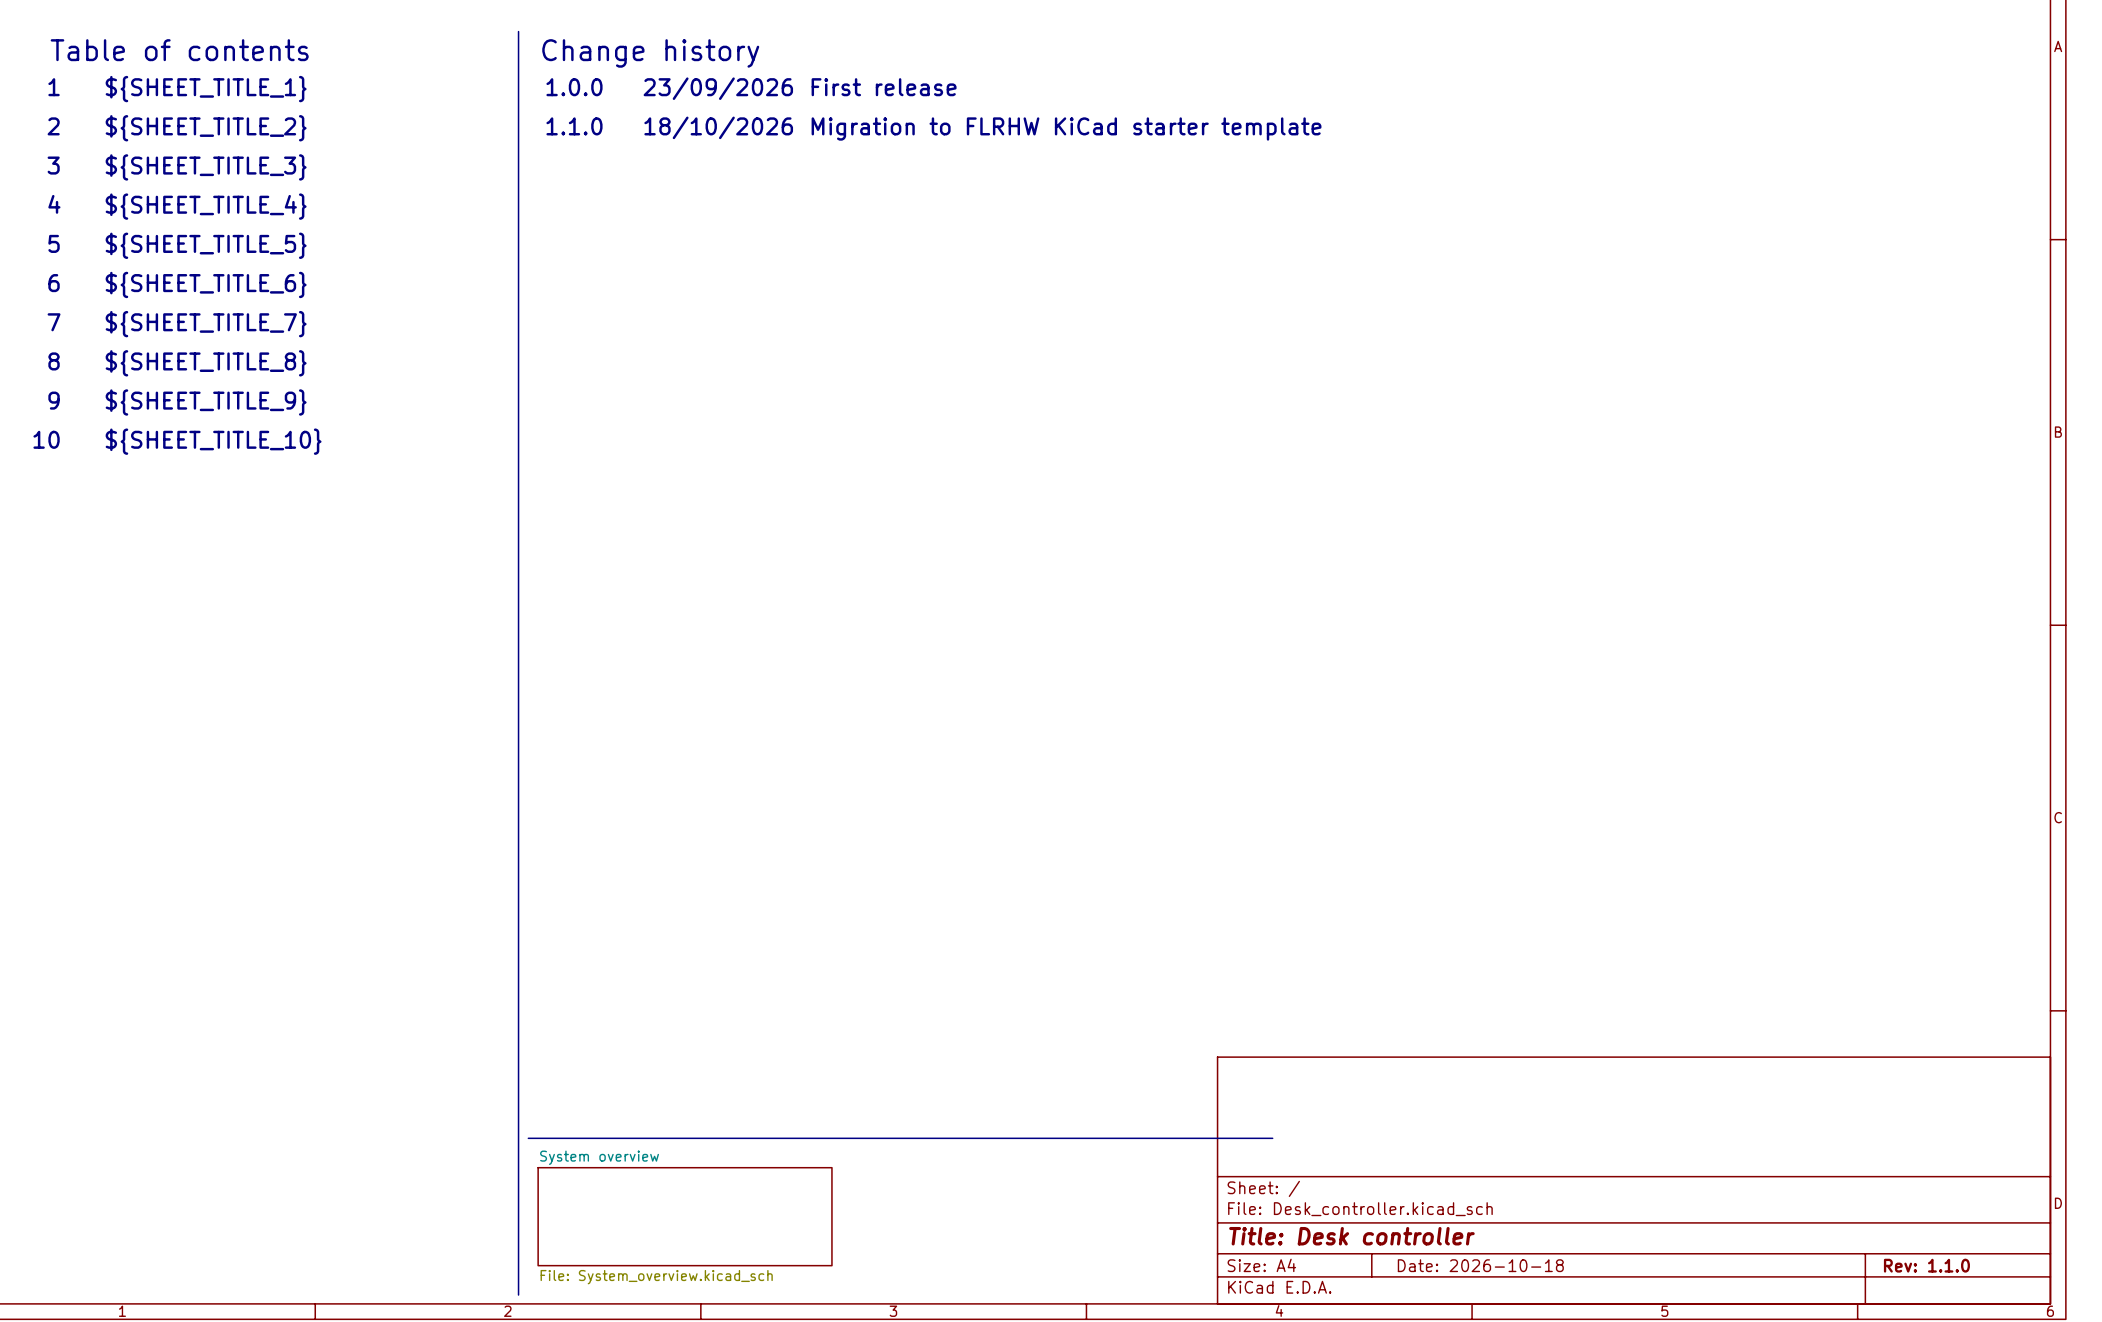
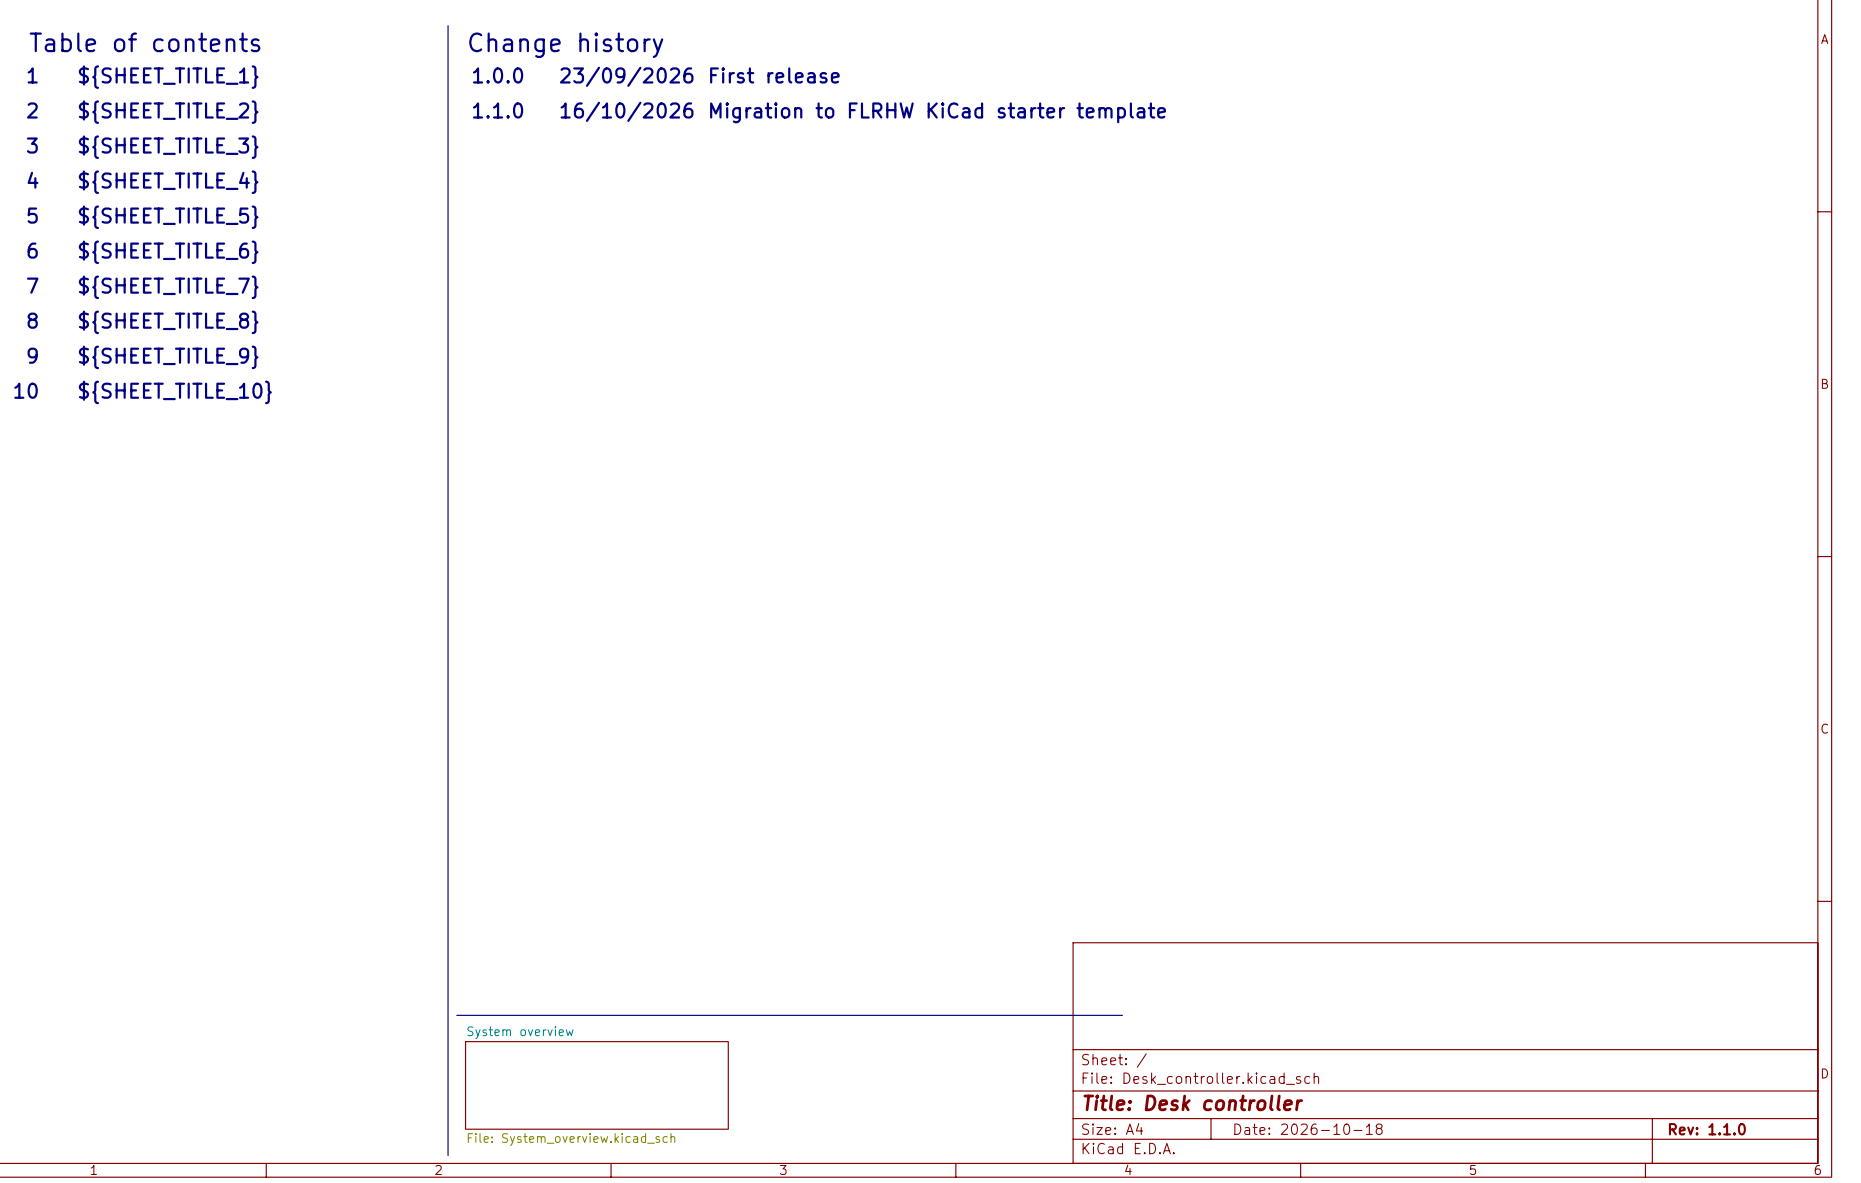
text: 18/10/2026 (718, 127) -> 16/10/2026 (627, 111)

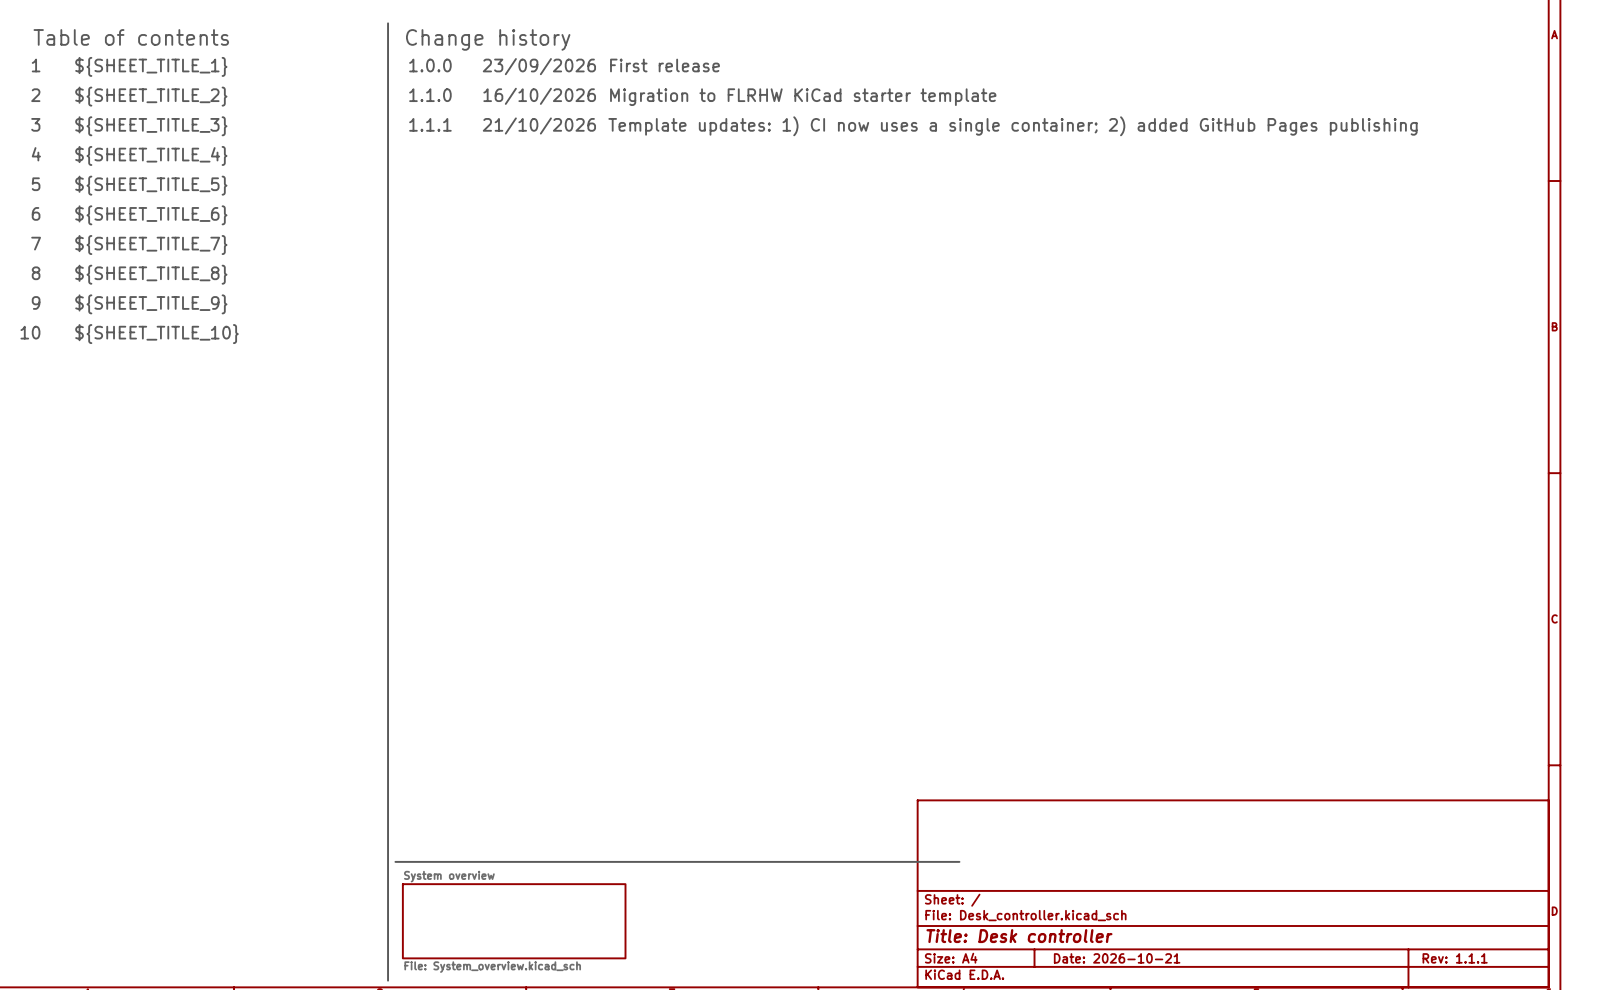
text: none -> 1.1.1 (430, 124)
text: none -> 21/10/2026 (539, 125)
text: none -> Template updates: 1) CI now uses a single container; 2) added GitHub Pages publishing (1012, 126)
title block: Date: 2026-10-18 (1308, 1129) -> Date: 2026-10-21 (1117, 958)
title block: Rev: 1.1.0 (1707, 1129) -> Rev: 1.1.1 (1455, 958)

